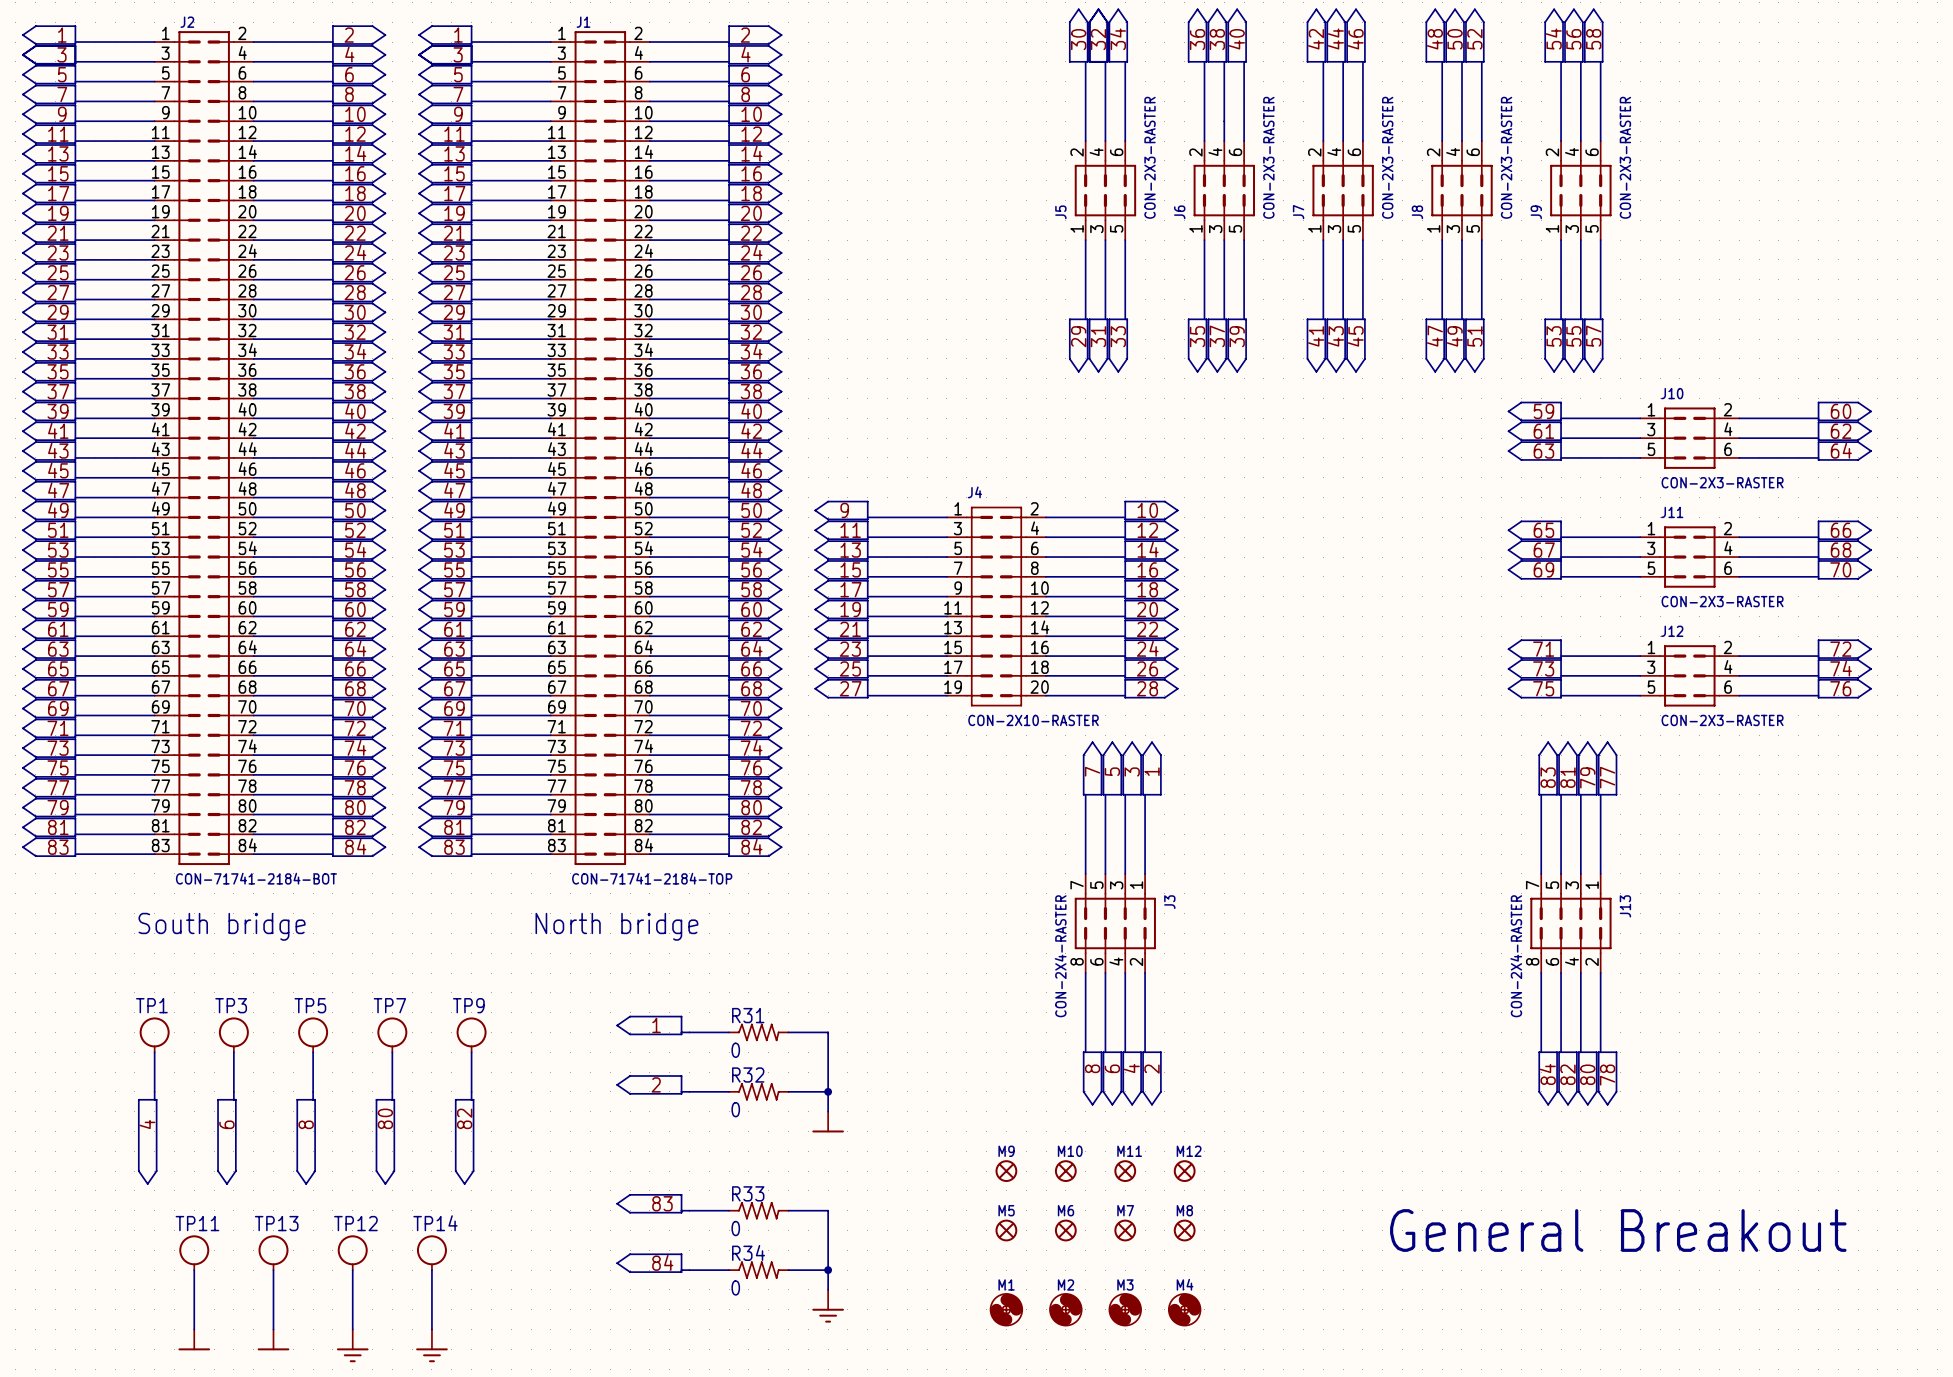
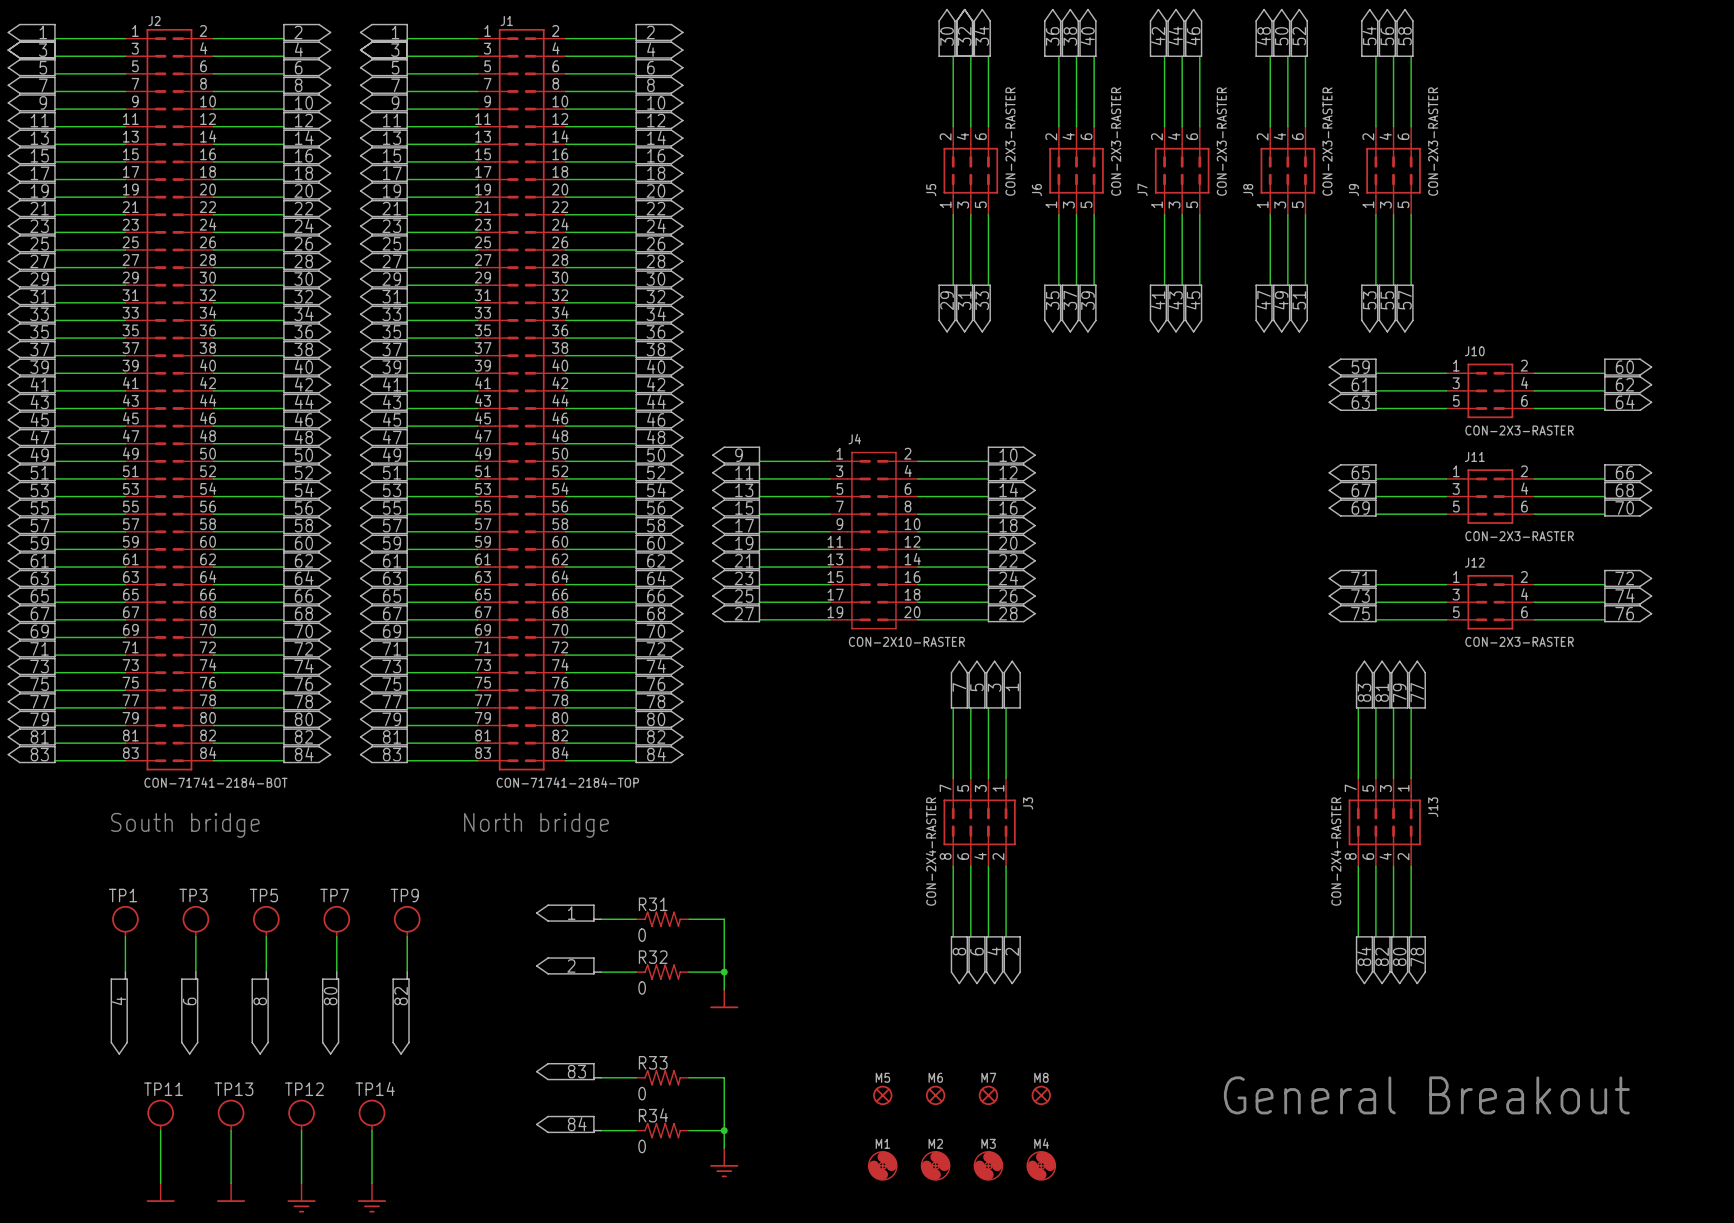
M9: (1006, 1171) -> none
M10: (1065, 1171) -> none
M11: (1125, 1171) -> none
M12: (1184, 1171) -> none

